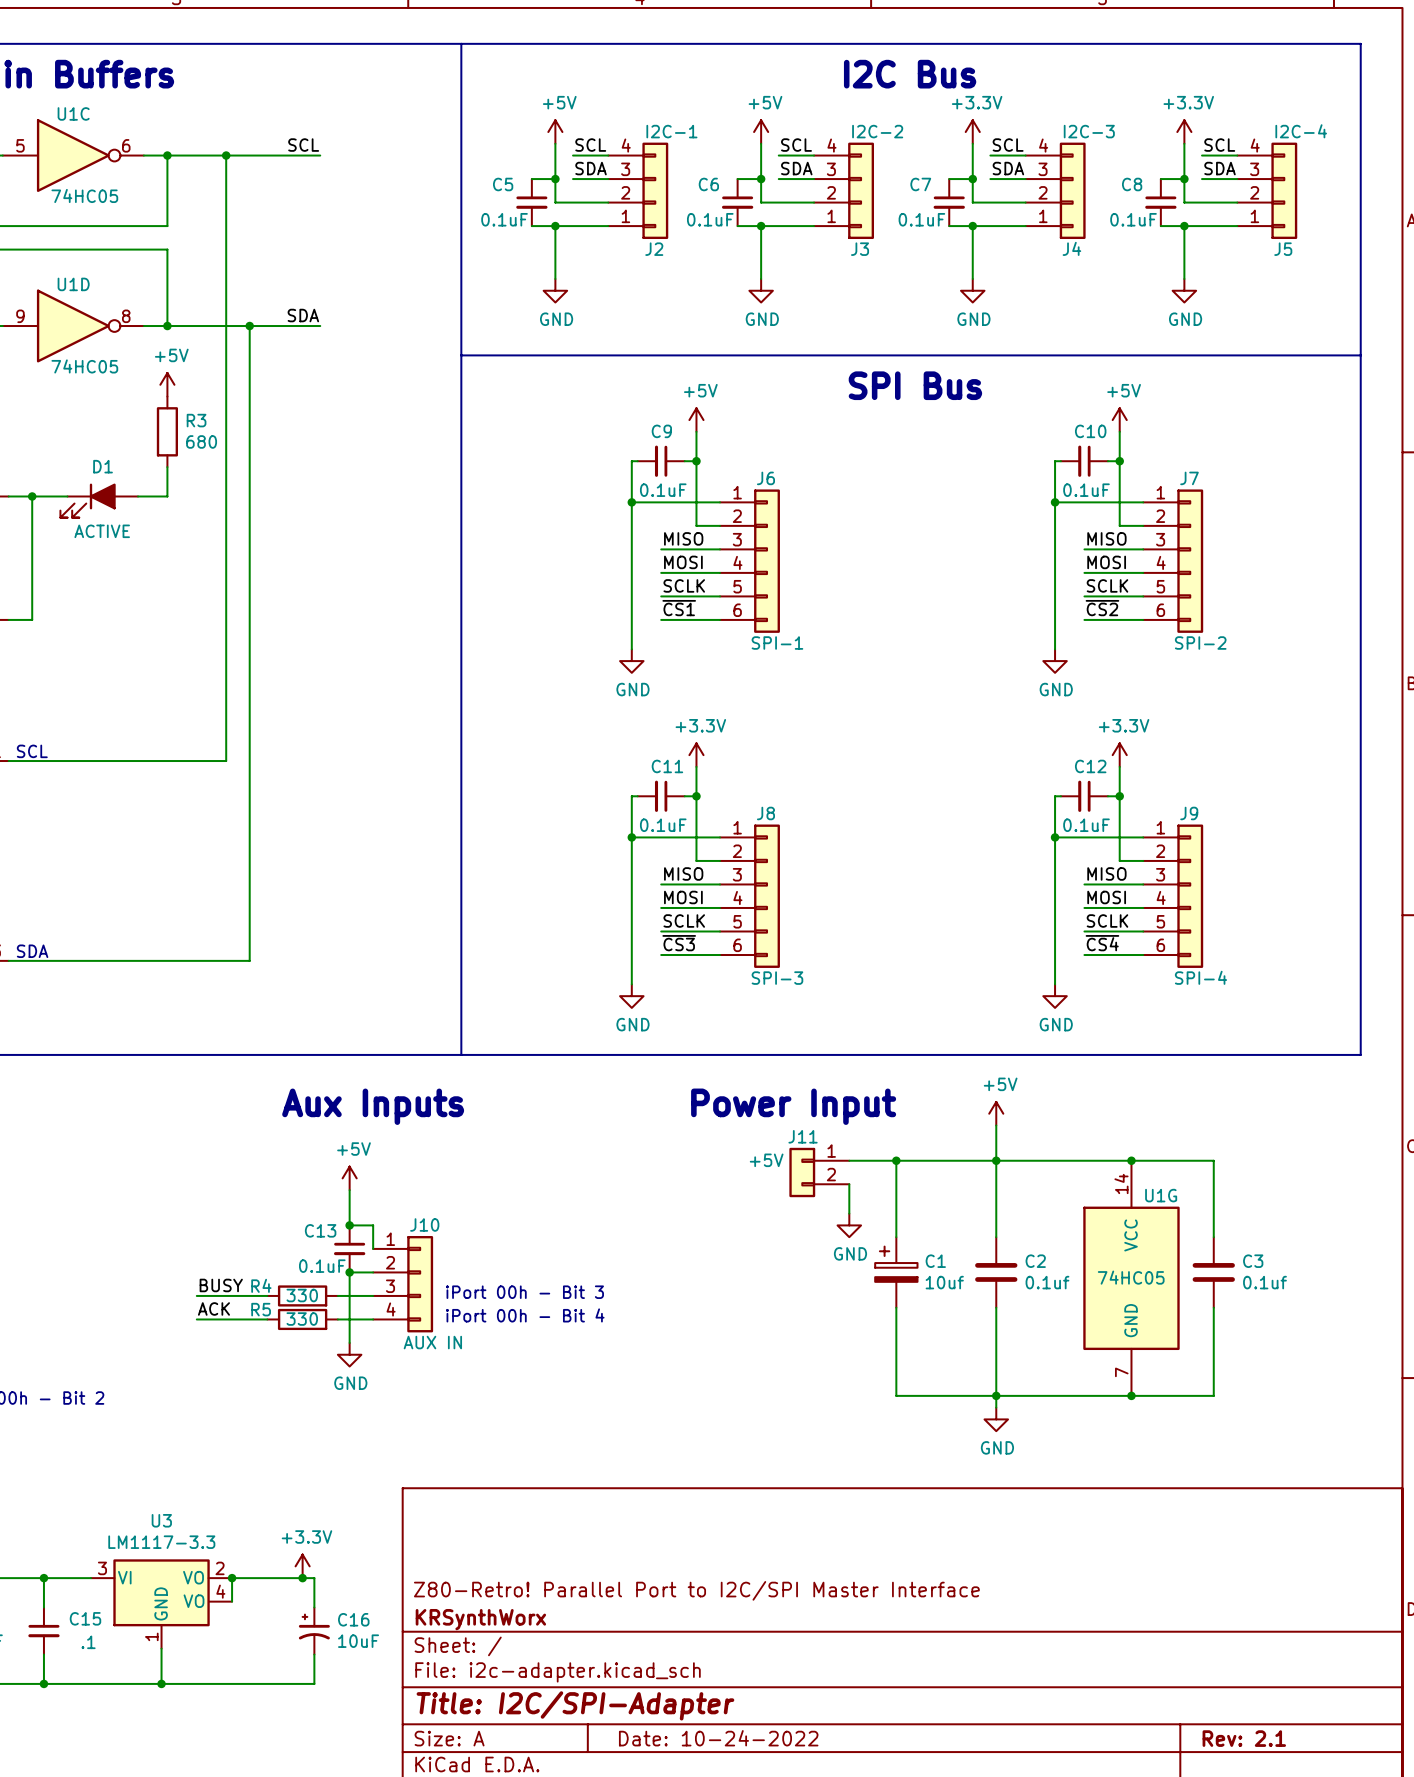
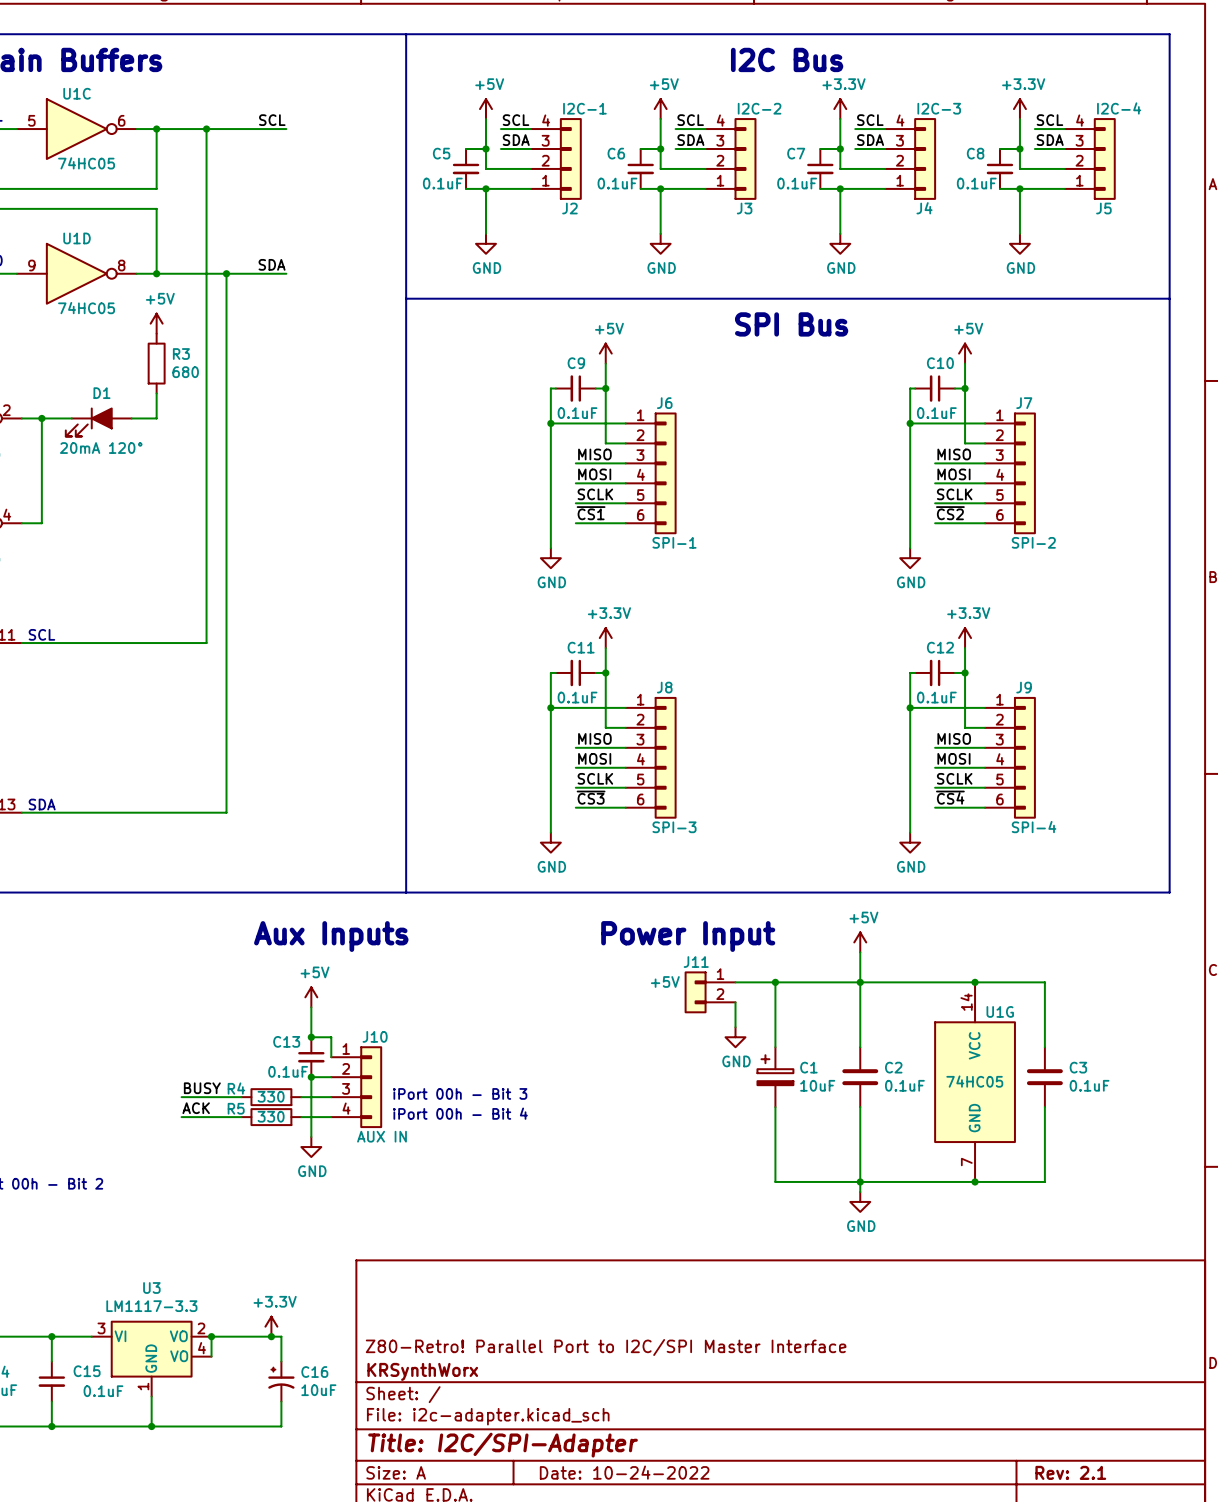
D1 value: ACTIVE (102, 531) -> 20mA 120° (101, 448)
C1 value: 10uf (944, 1282) -> 10uF (817, 1085)
C2 value: 0.1uf (1047, 1282) -> 0.1uF (904, 1085)
C3 value: 0.1uf (1264, 1282) -> 0.1uF (1089, 1085)
C15 value: .1 (88, 1642) -> 0.1uF (103, 1391)

